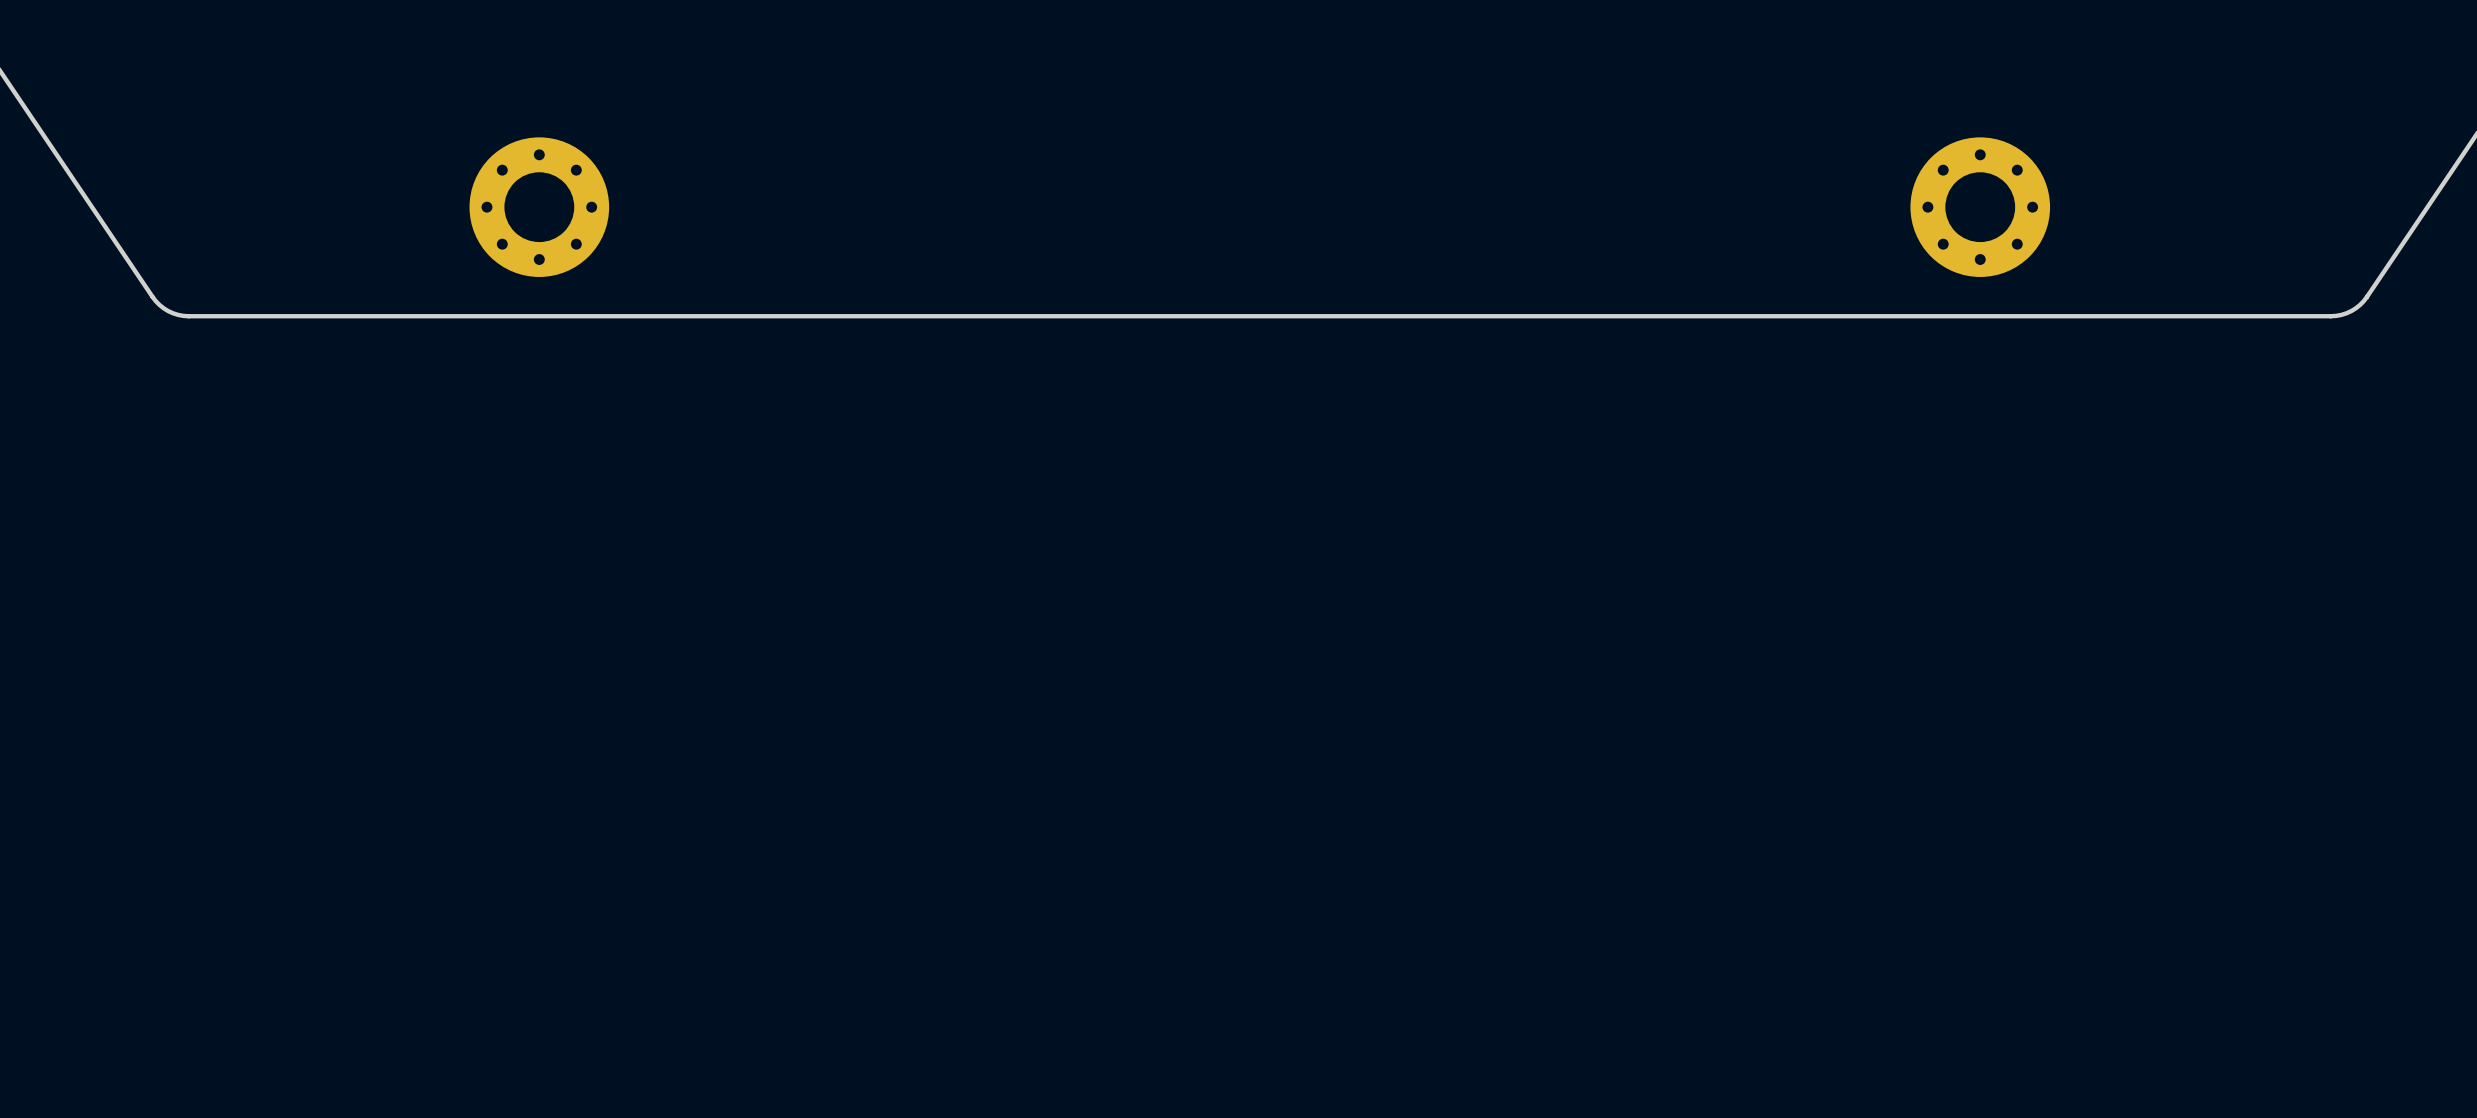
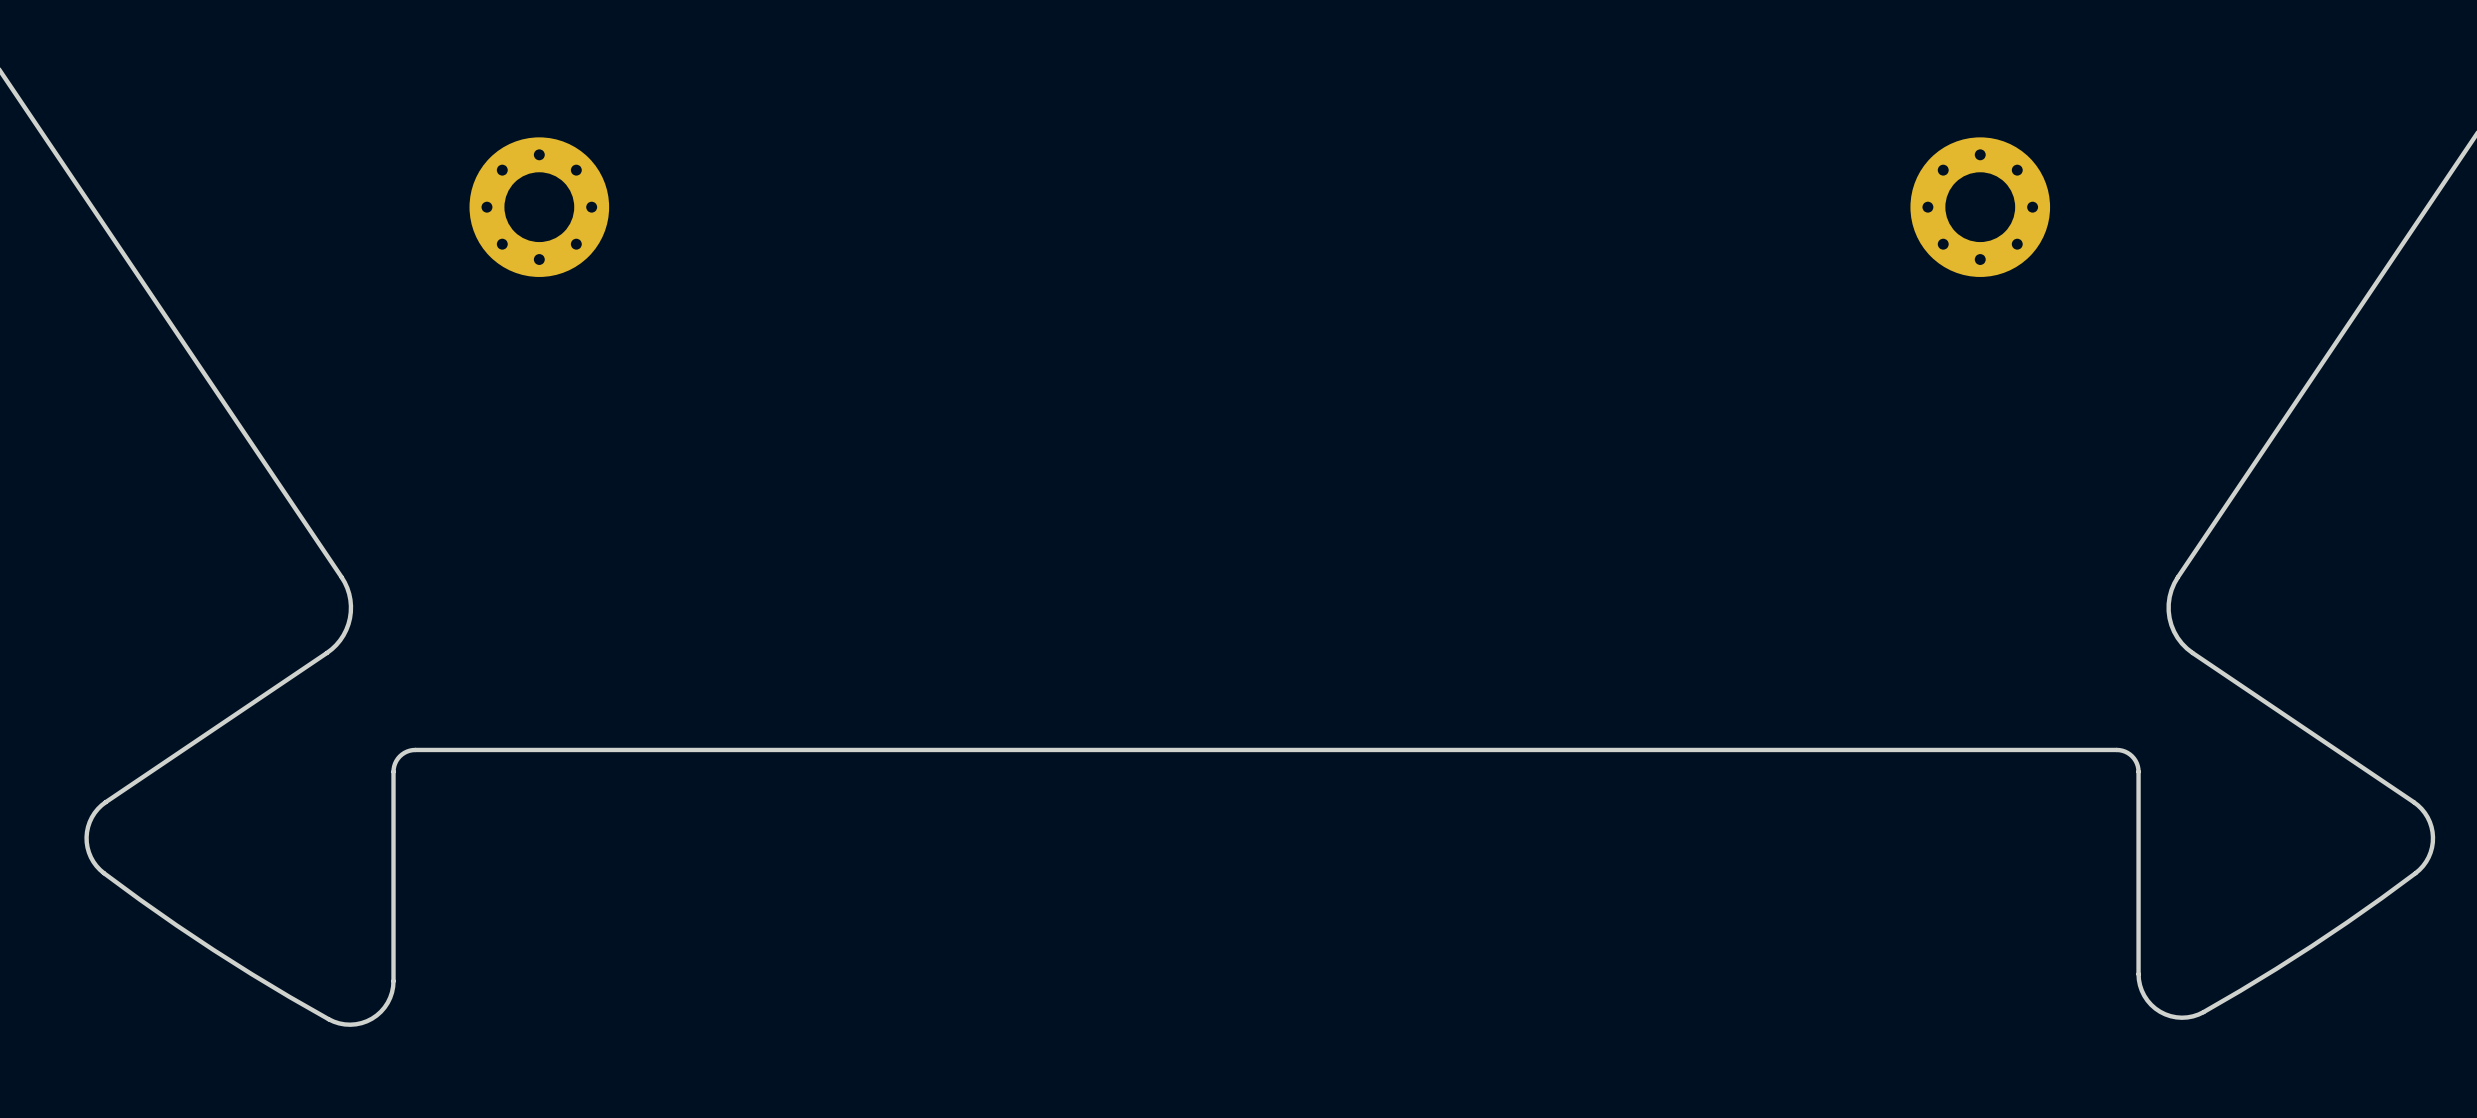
board edge: (152, 297) (168, 311) (188, 316) (2330, 316) (2351, 311) (2366, 297) -> (152, 297) (341, 577) (349, 593) (350, 612) (346, 629) (331, 649) (101, 805) (94, 812) (88, 826) (87, 847) (90, 857) (99, 869) (176, 925) (289, 997) (333, 1021) (350, 1024) (361, 1023) (376, 1015) (387, 1002) (392, 992) (393, 768) (399, 756) (406, 751) (415, 749) (2119, 750) (2132, 756) (2138, 768) (2140, 985) (2147, 1000) (2160, 1011) (2176, 1017) (2198, 1014) (2276, 968) (2381, 898) (2419, 869) (2426, 861) (2432, 847) (2431, 826) (2424, 812) (2417, 805) (2186, 648) (2174, 631) (2168, 611) (2169, 596) (2177, 577) (2366, 297)

